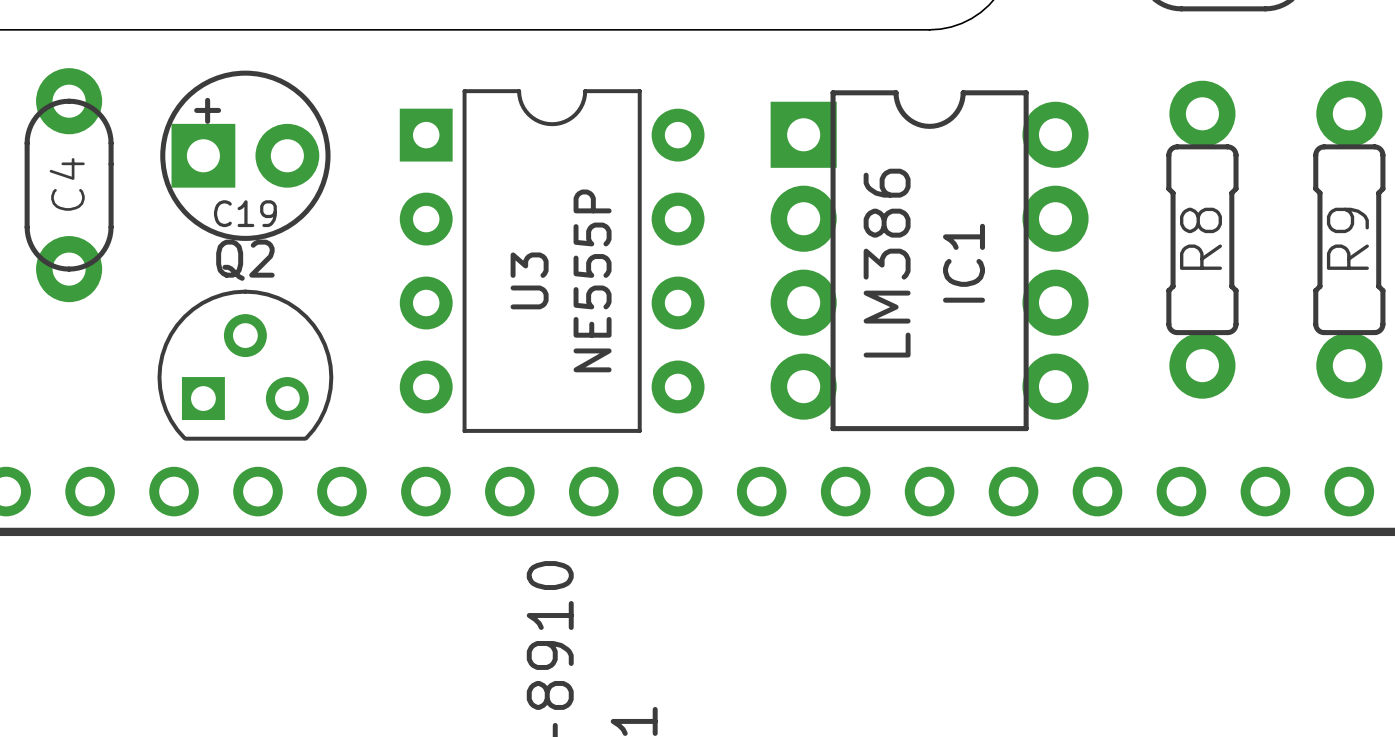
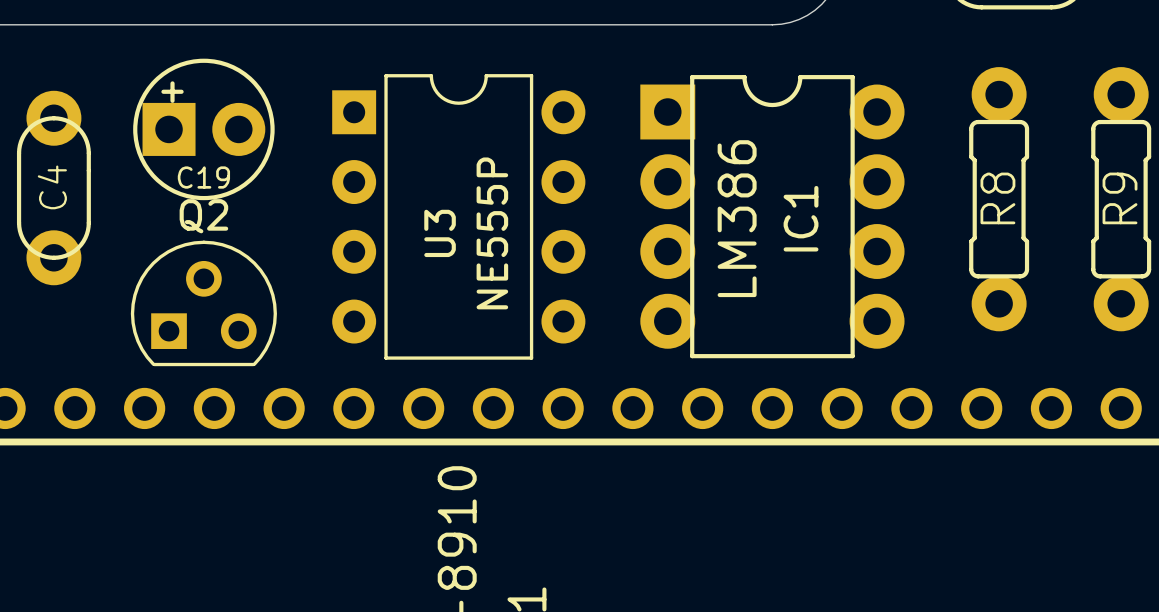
C4 position: (69, 185) -> (53, 188)

